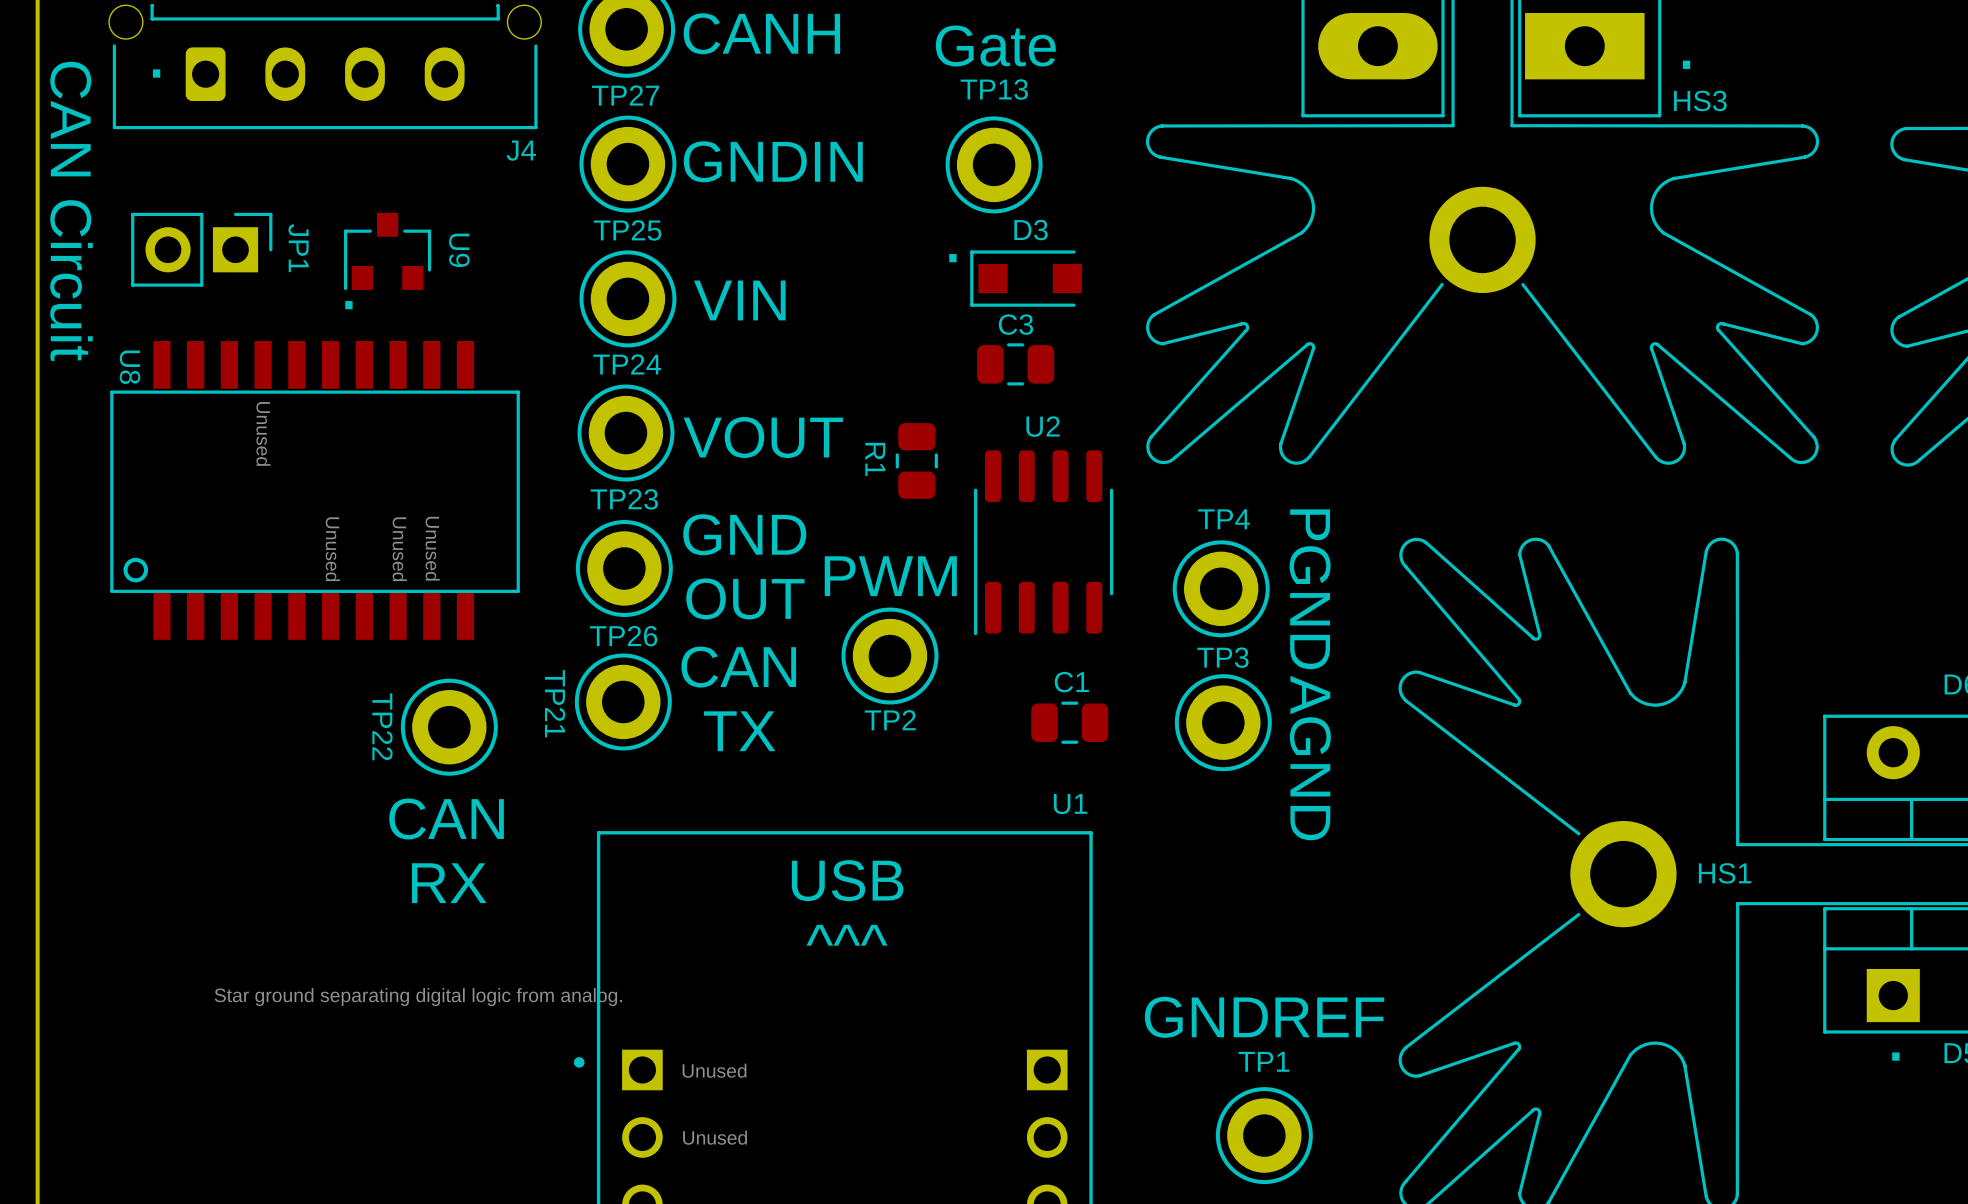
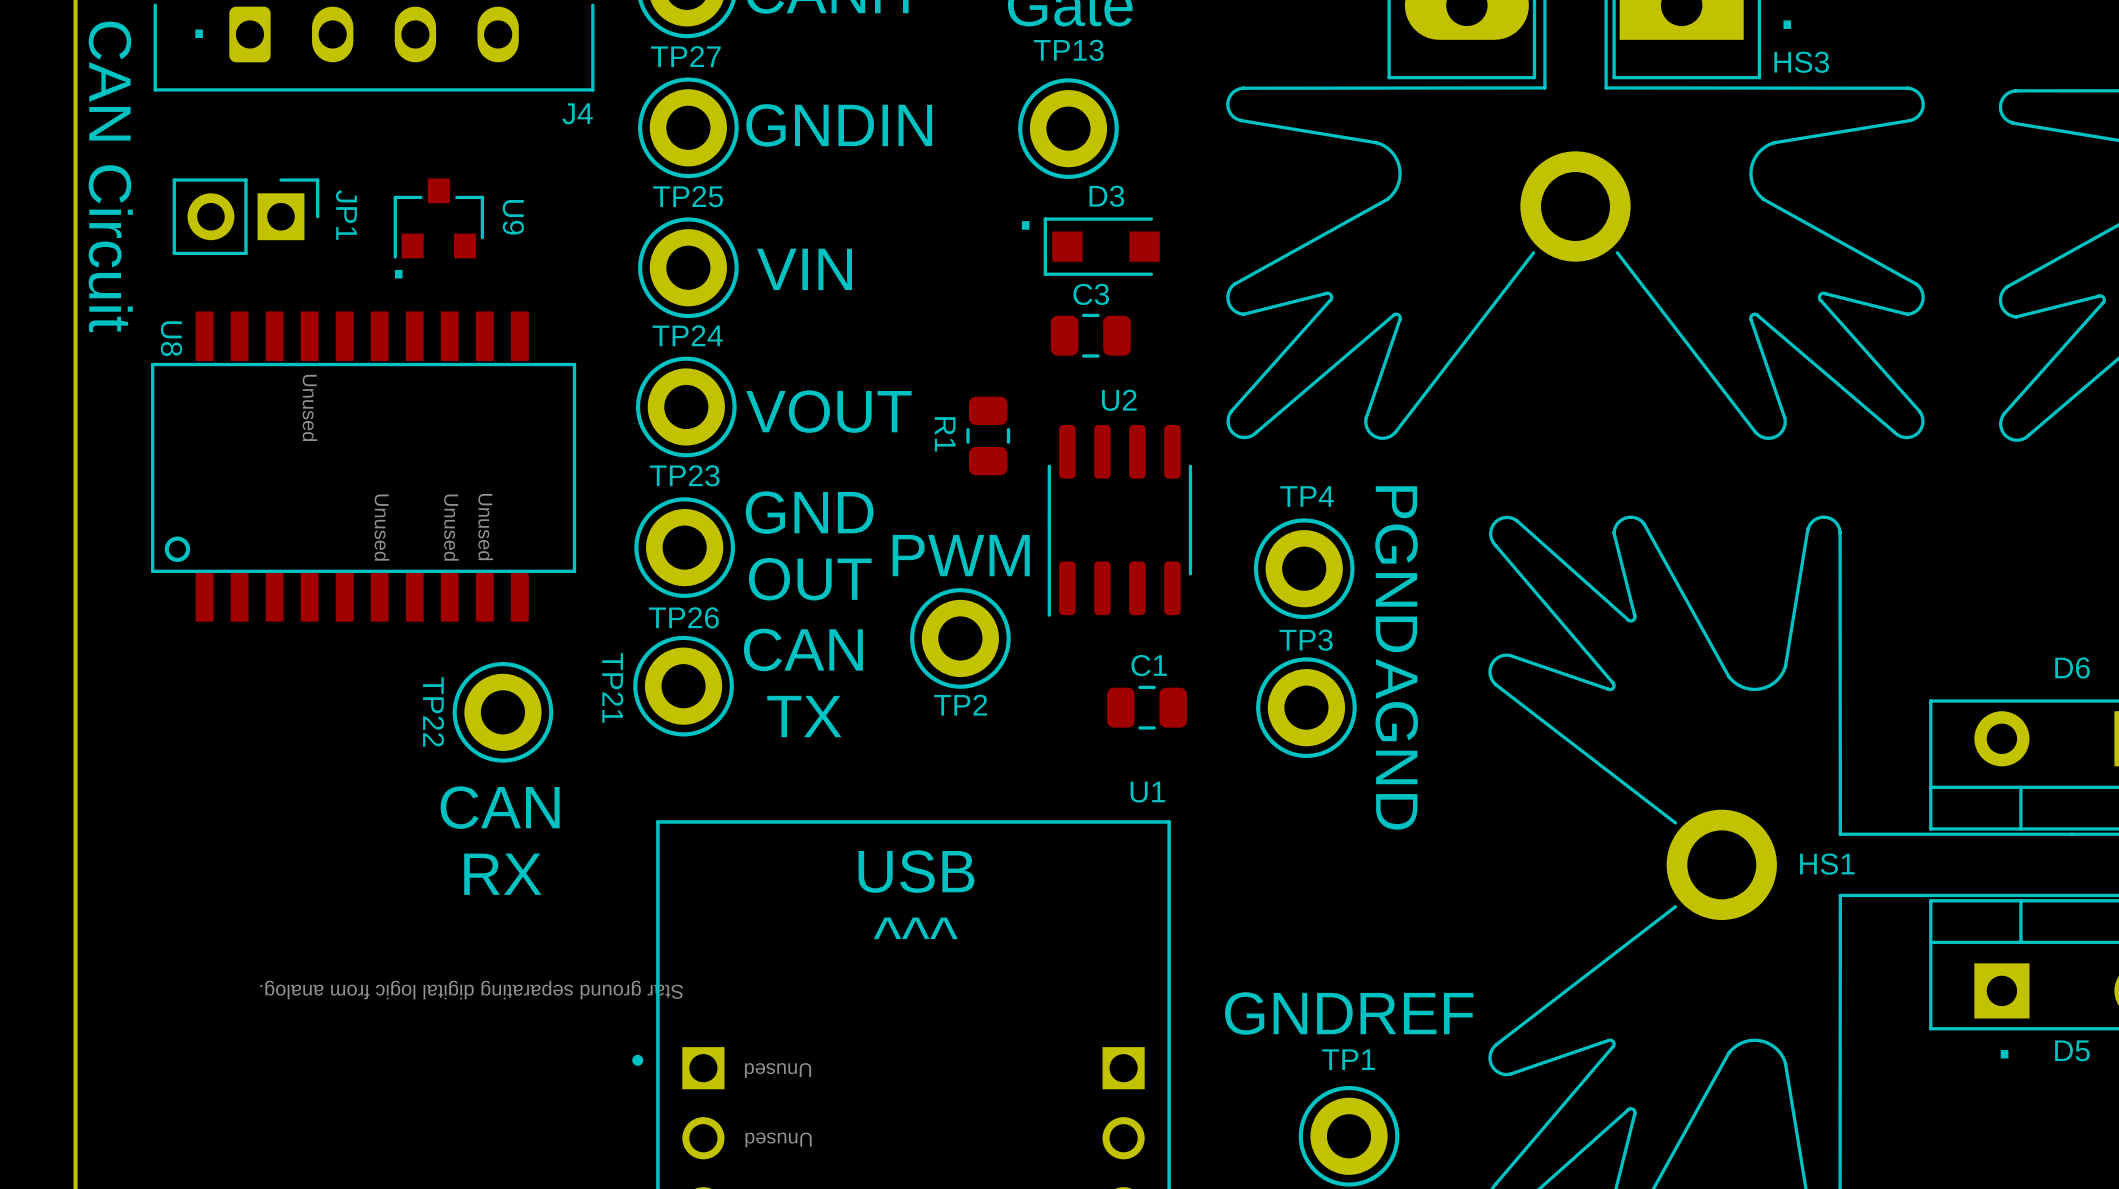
text rotation: 0° (418, 997) -> 180° (471, 990)
text rotation: 0° (714, 1070) -> 180° (778, 1070)
text rotation: 0° (715, 1137) -> 180° (778, 1139)

